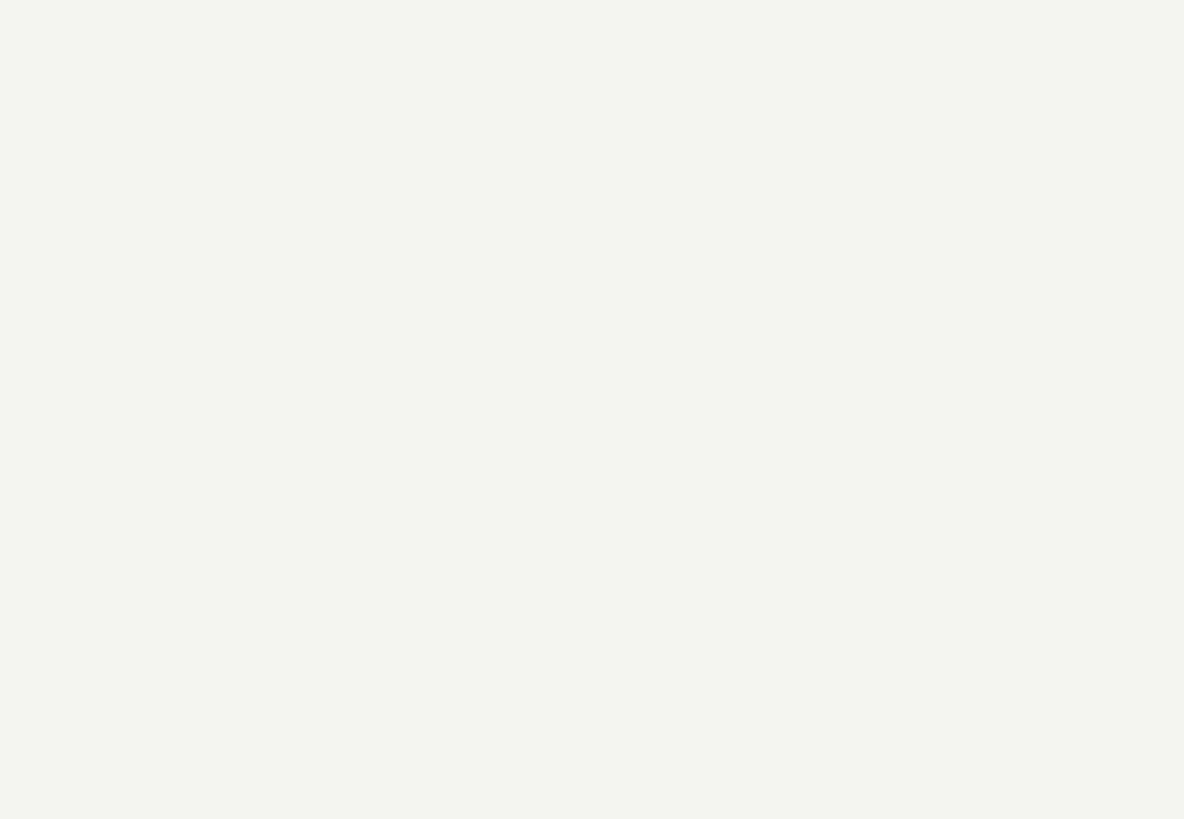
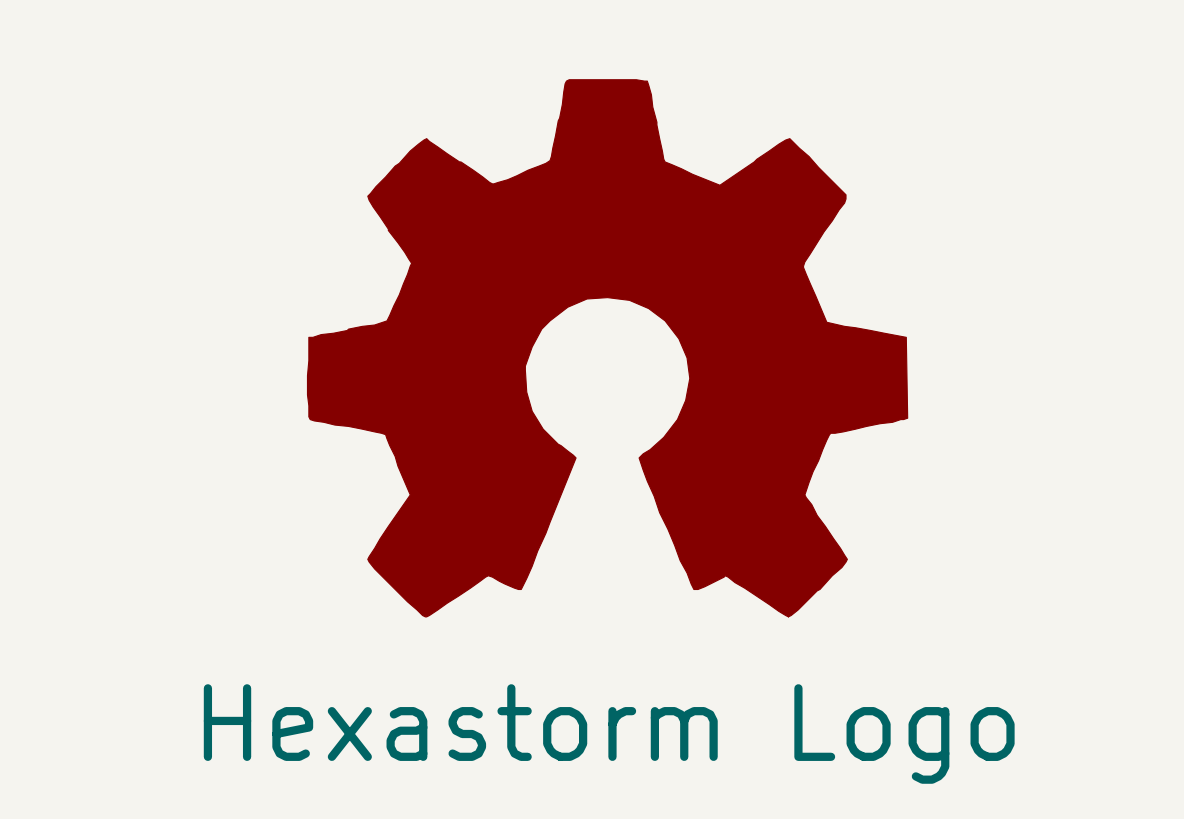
part: none -> (607, 348)

